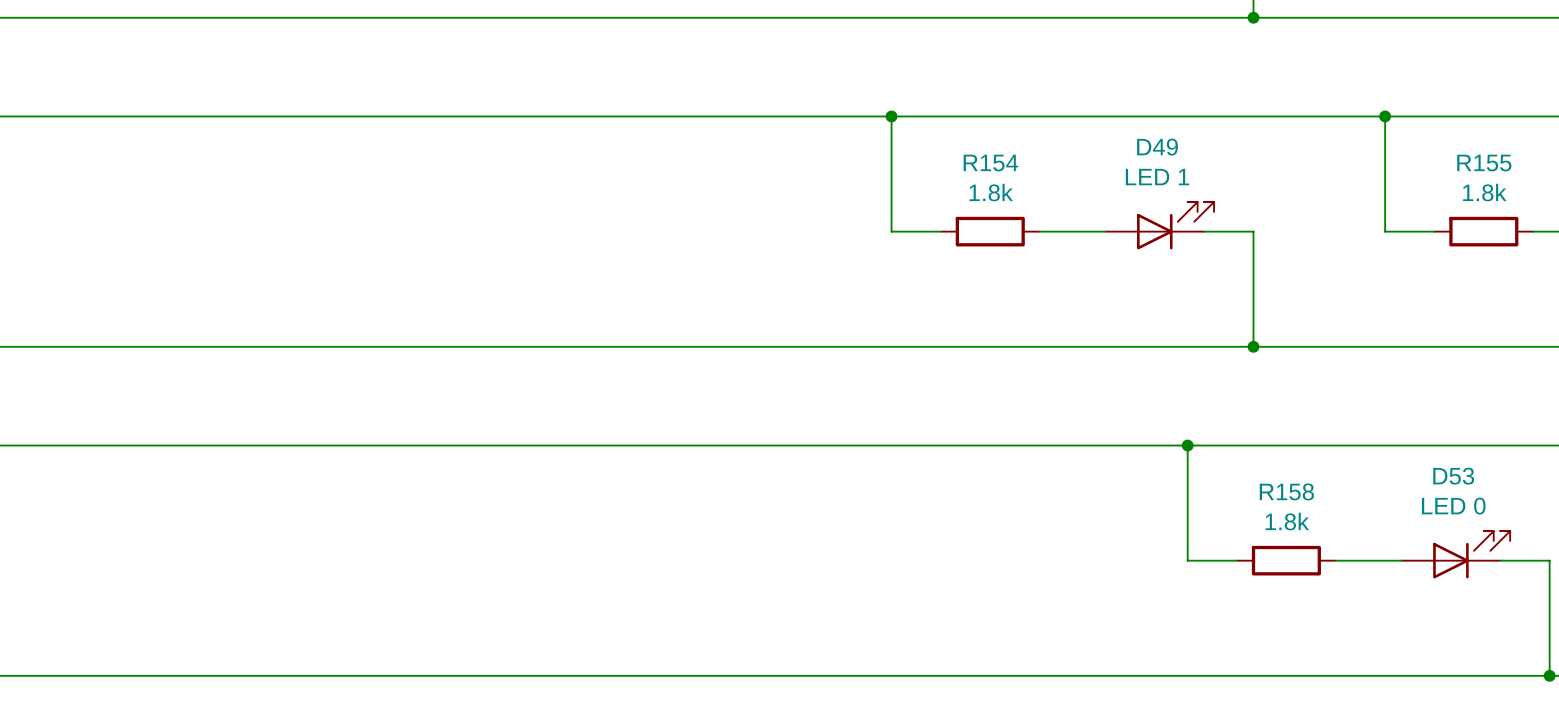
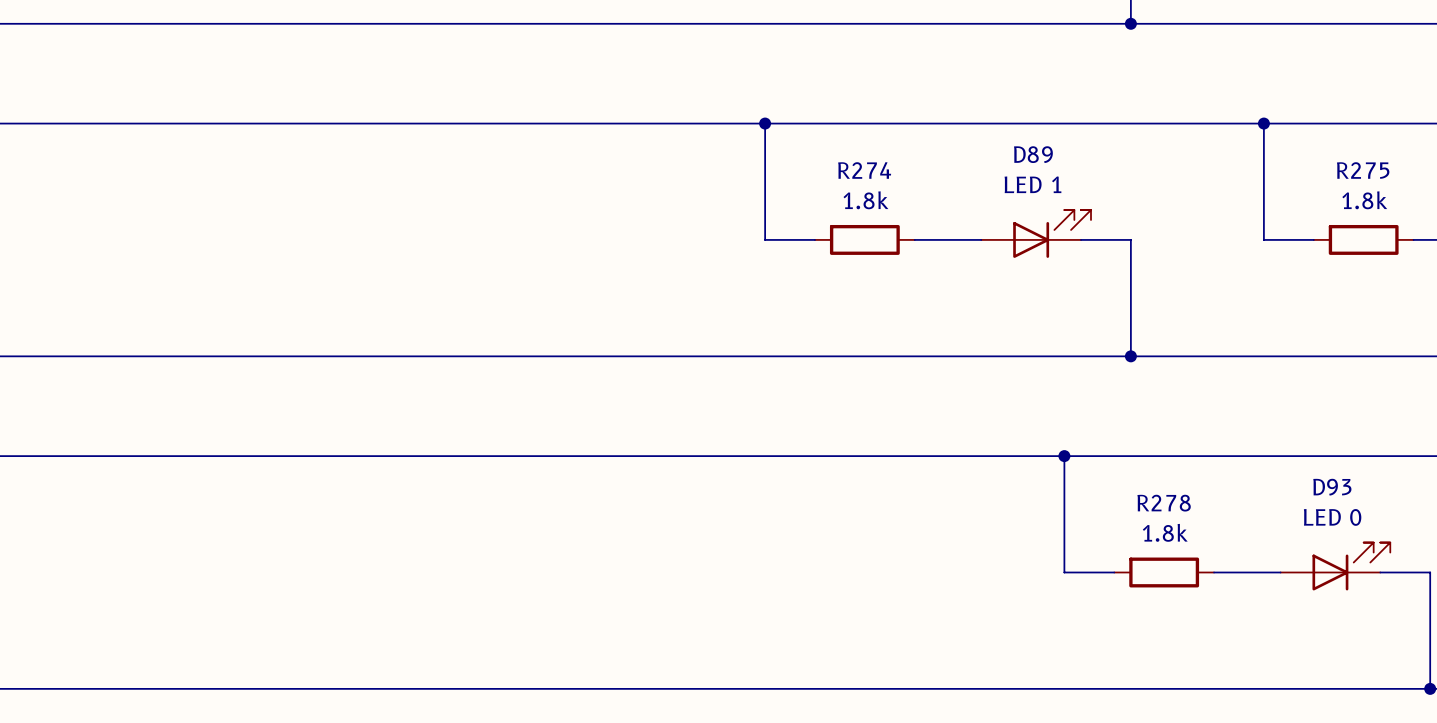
D49 name: D49 (1157, 147) -> D89 (1033, 154)
R154 name: R154 (990, 163) -> R274 (864, 170)
R155 name: R155 (1484, 163) -> R275 (1363, 170)
D53 name: D53 (1453, 476) -> D93 (1332, 487)
R158 name: R158 (1286, 491) -> R278 (1164, 503)

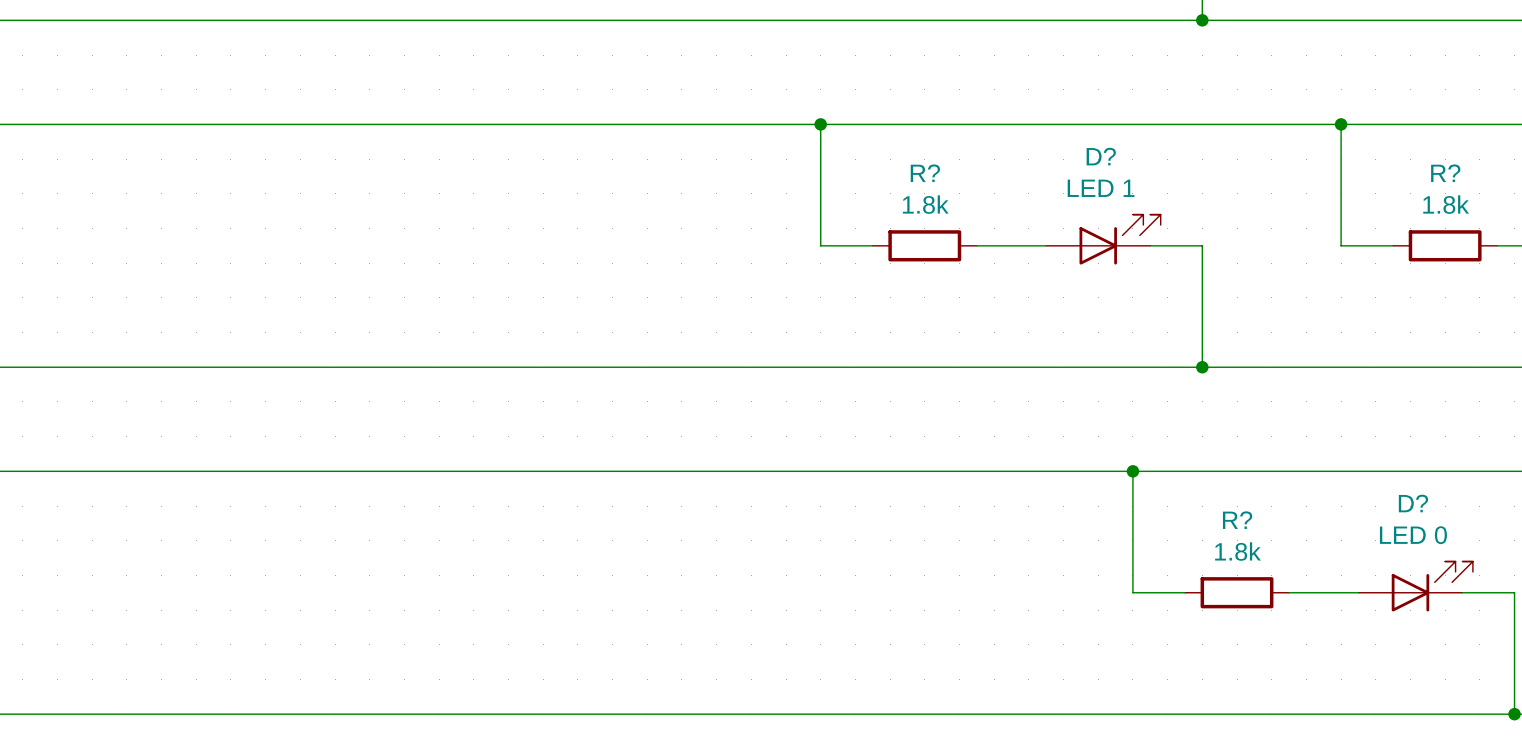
D89 name: D89 (1033, 154) -> D? (1101, 156)
R274 name: R274 (864, 170) -> R? (925, 173)
R275 name: R275 (1363, 170) -> R? (1445, 173)
D93 name: D93 (1332, 487) -> D? (1413, 503)
R278 name: R278 (1164, 503) -> R? (1237, 520)

